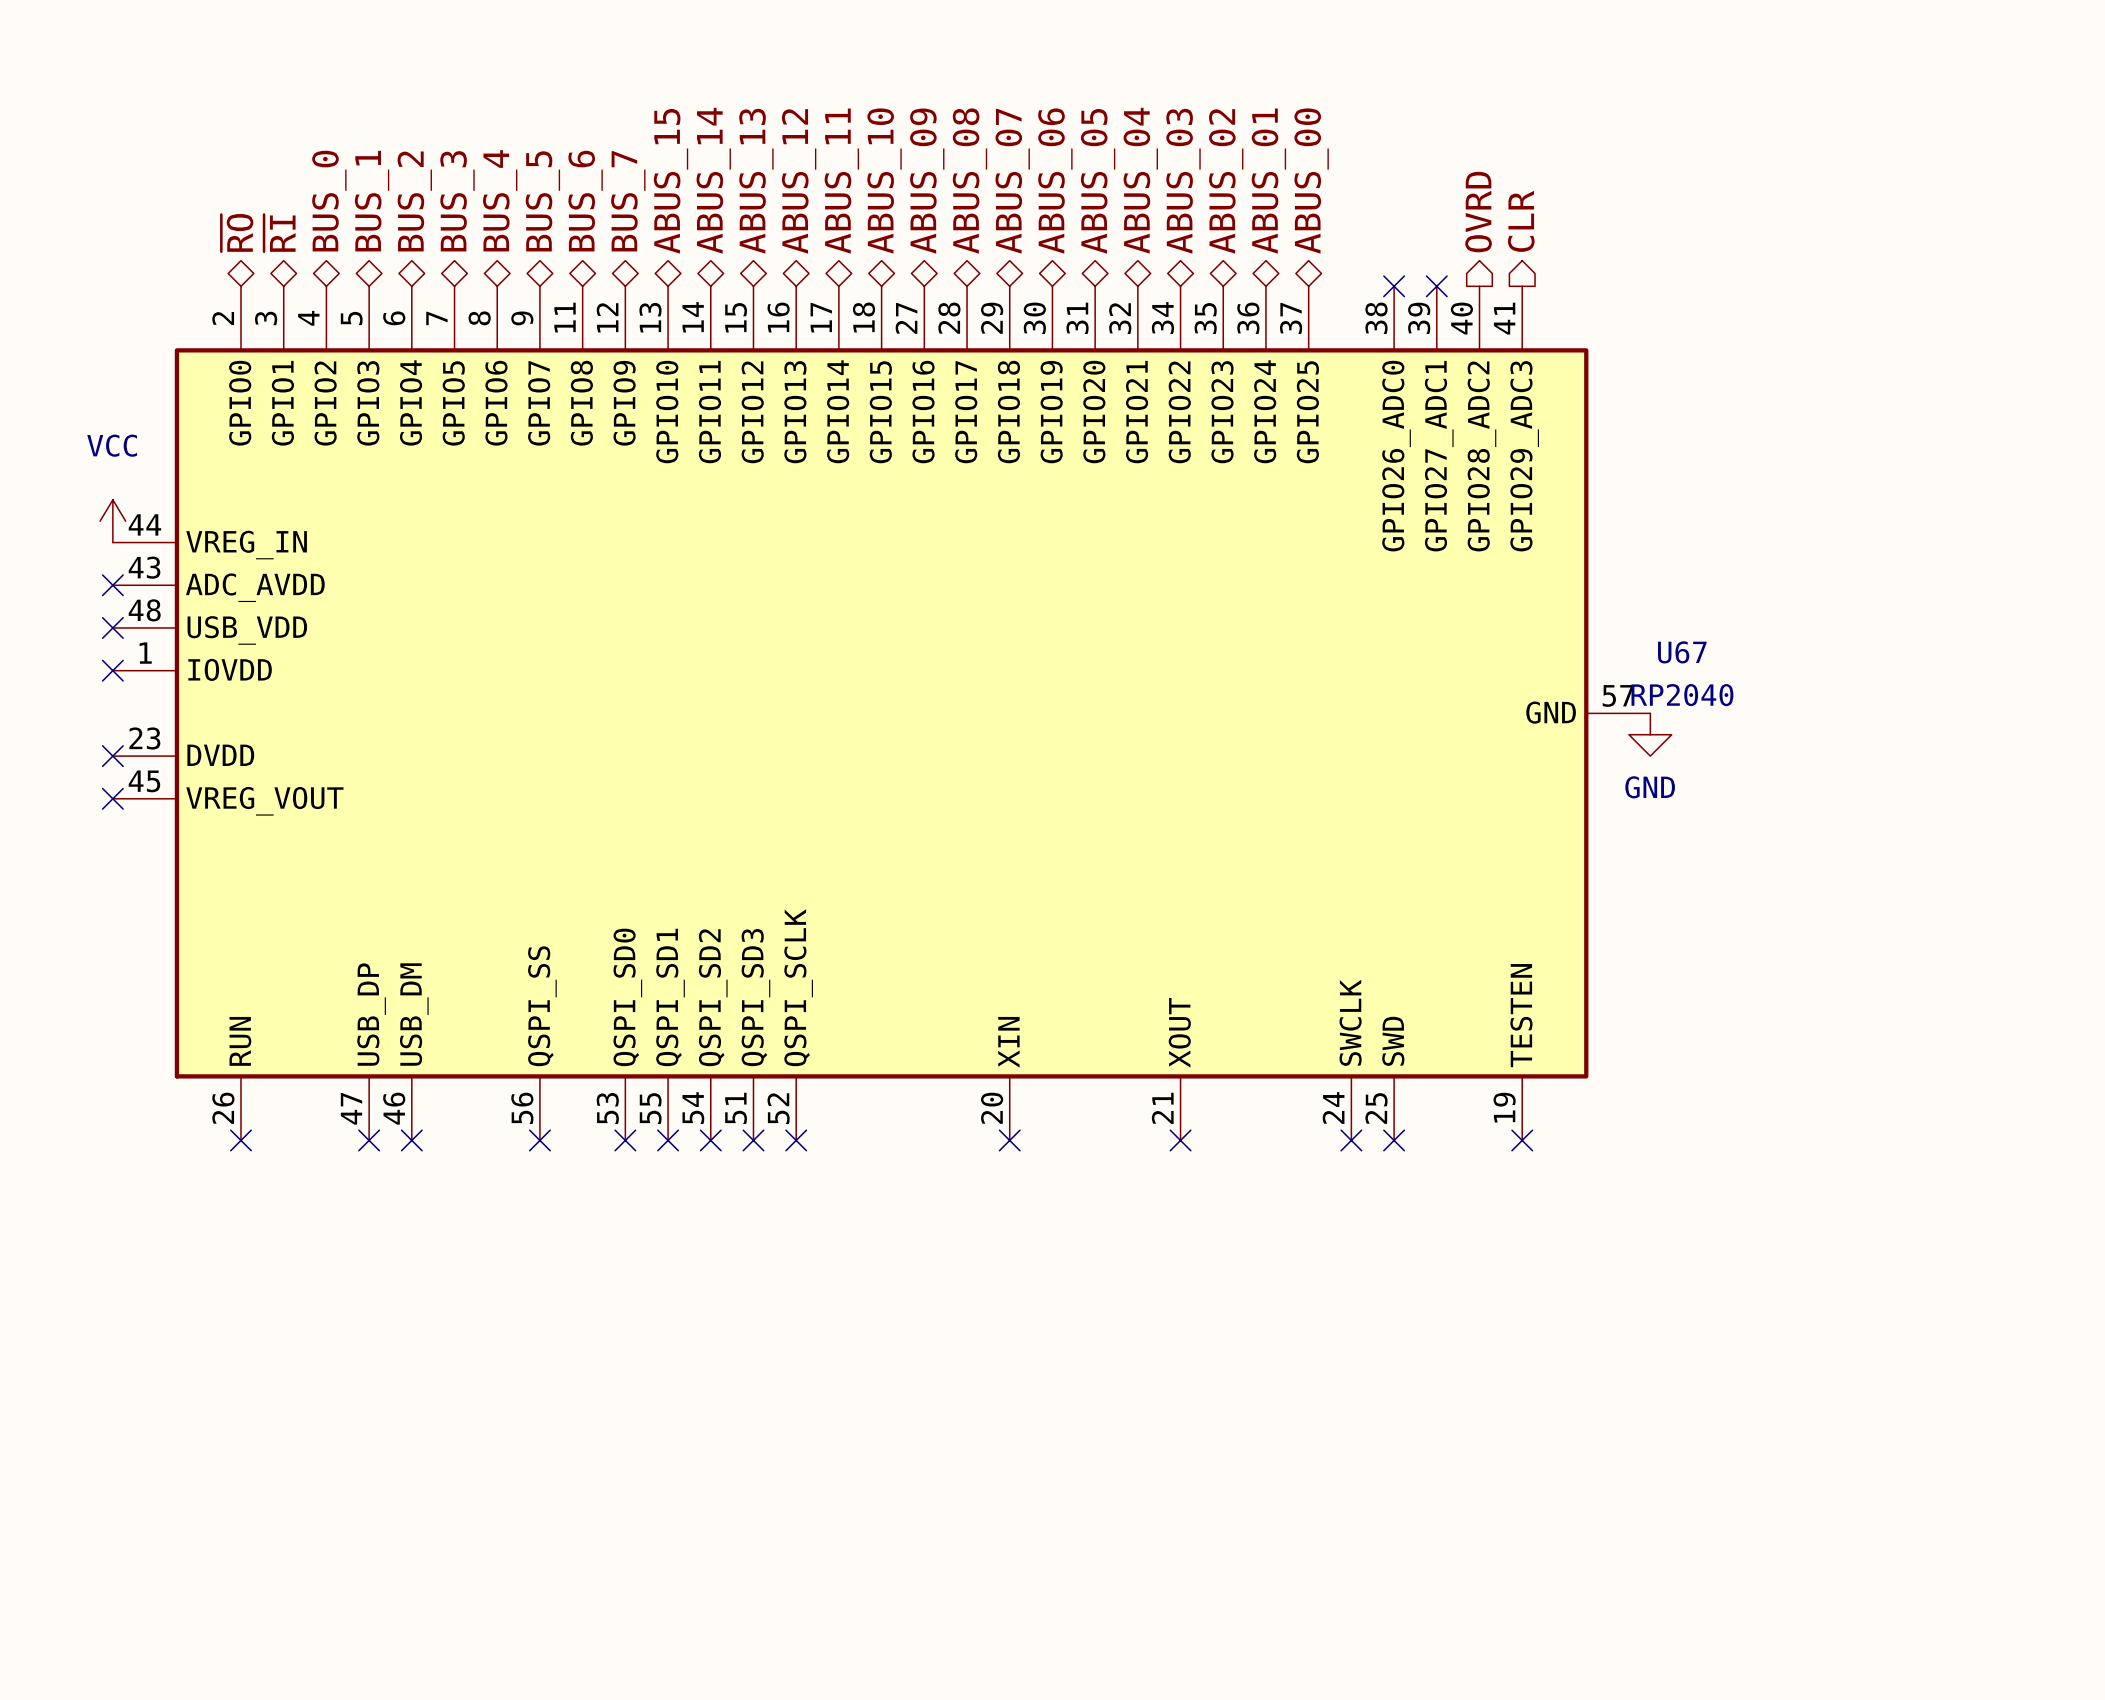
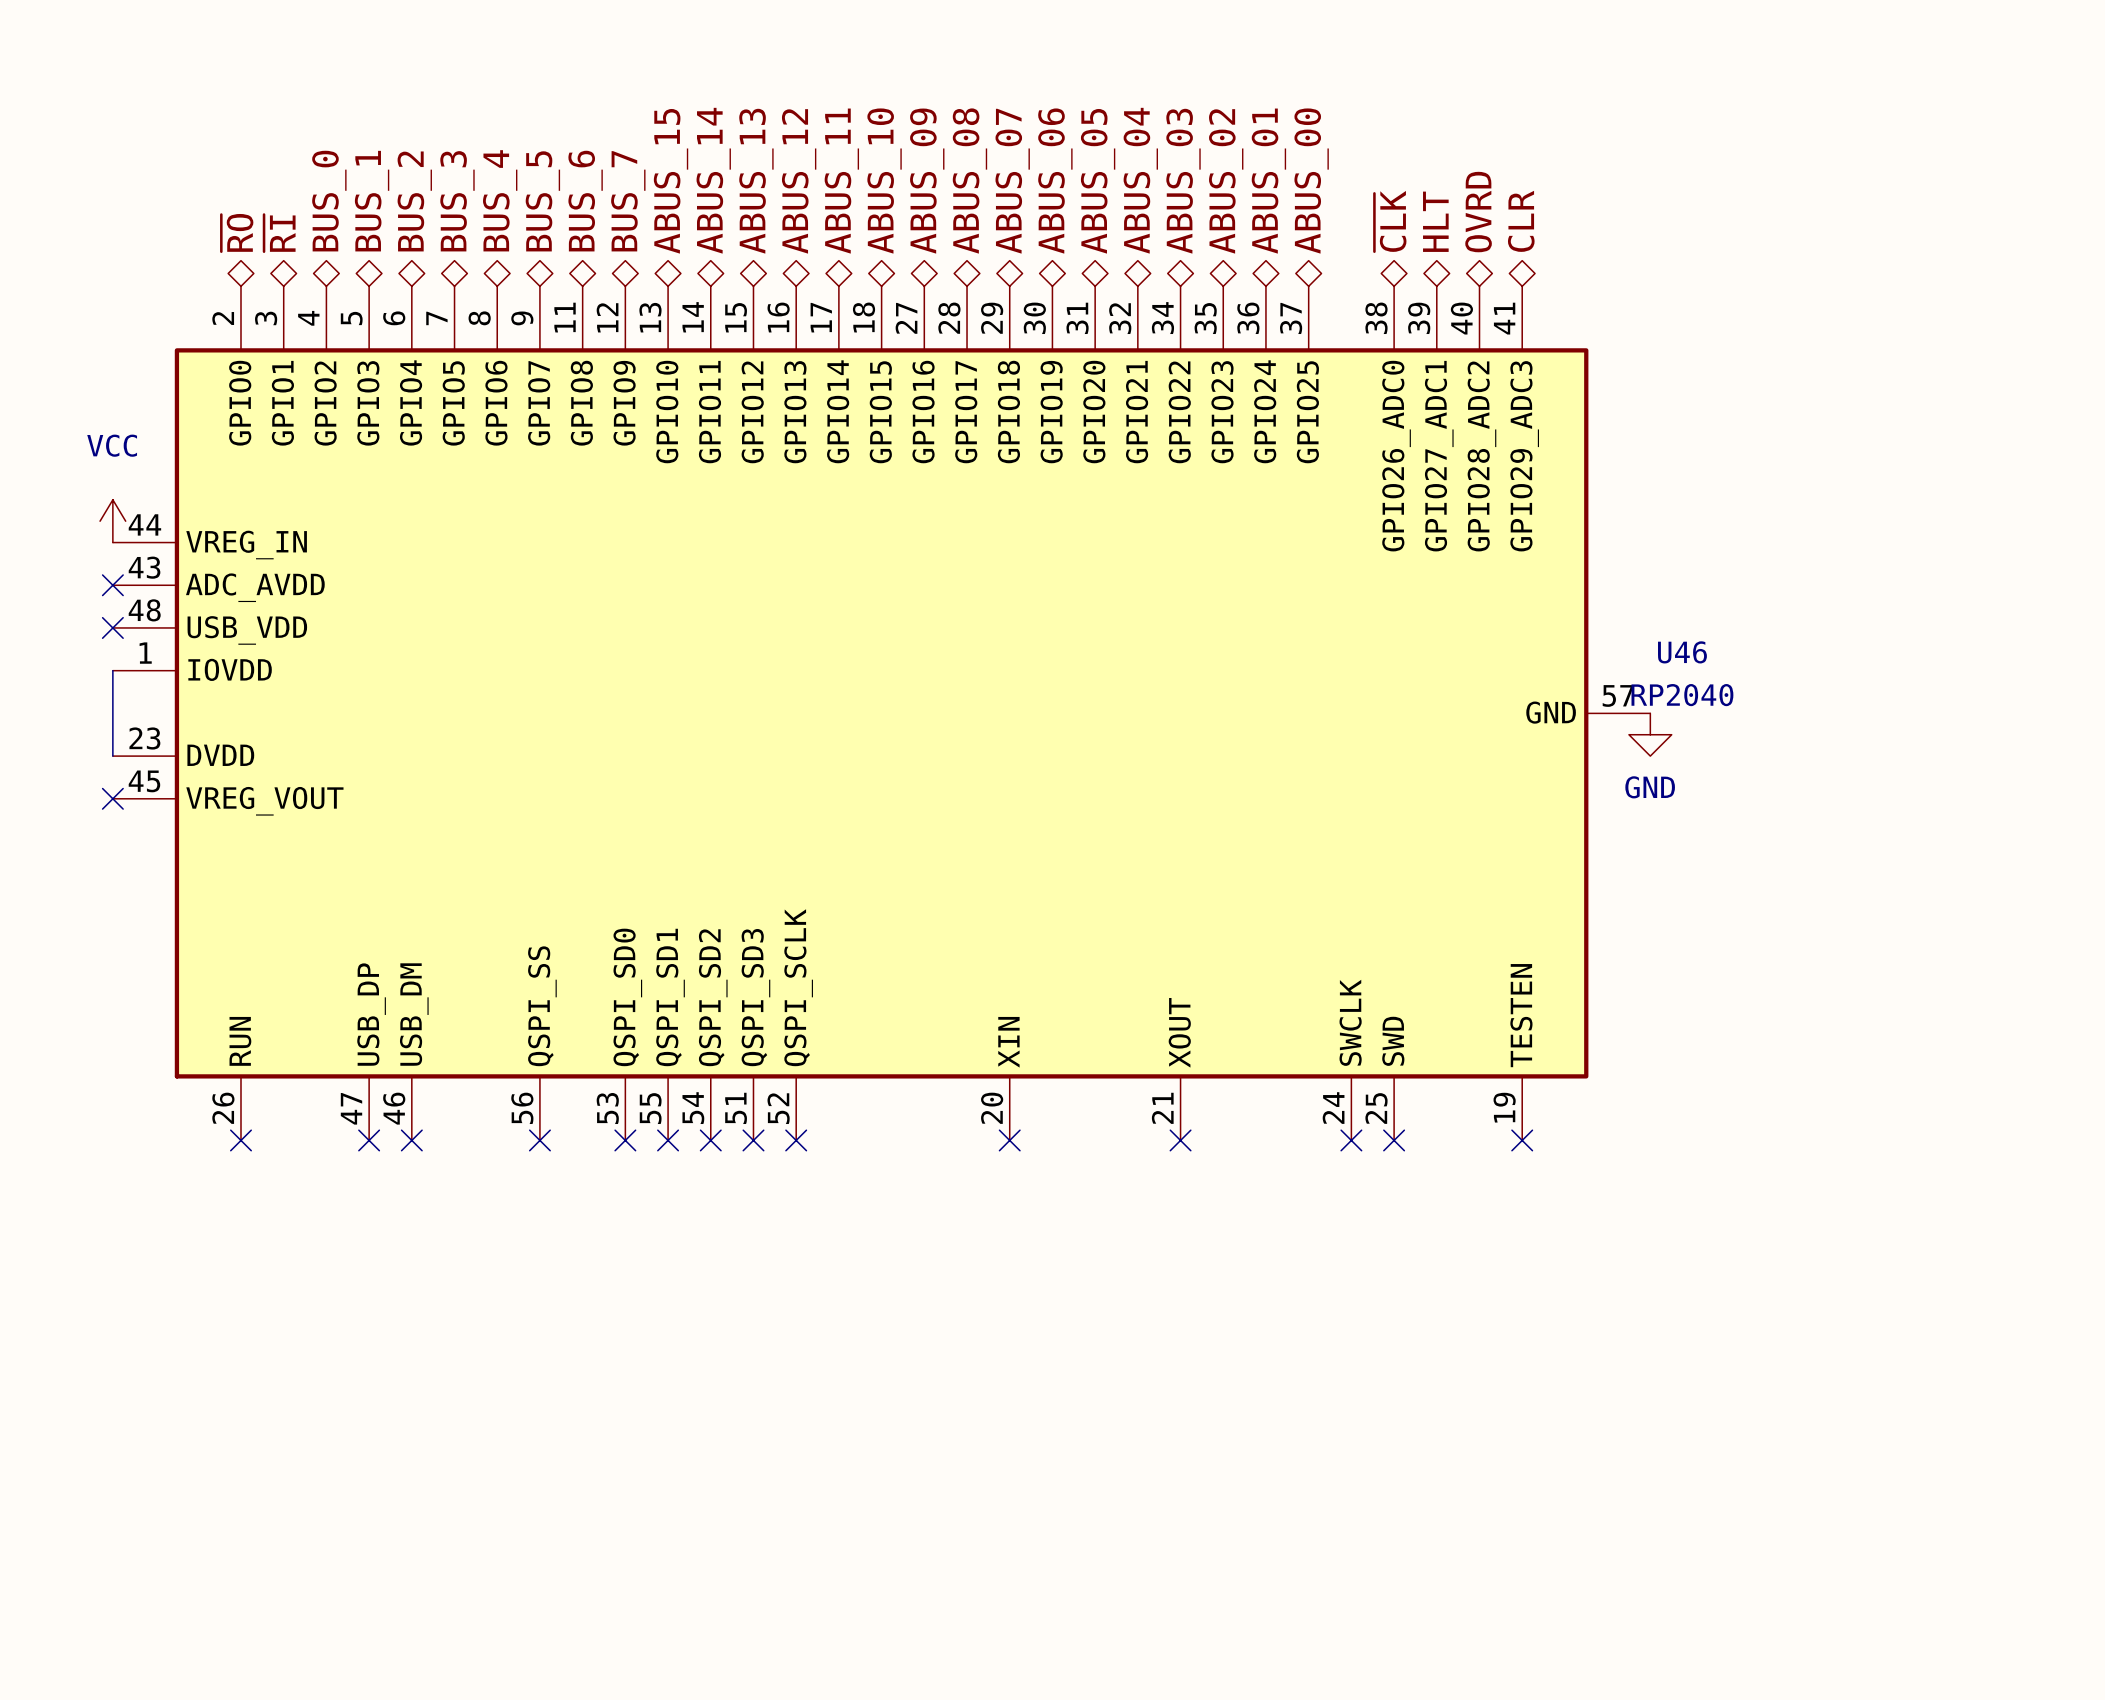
hierarchical label shape: output (1478, 212) -> bidirectional (1478, 212)
hierarchical label: none -> ~{CLK} (1390, 221)
hierarchical label: none -> HLT (1435, 221)
hierarchical label shape: output (1521, 221) -> bidirectional (1521, 221)
no-connect mark: (1394, 286) -> none
no-connect mark: (1436, 286) -> none
U67 name: U67 (1682, 652) -> U46 (1682, 652)
wire: none -> (112, 670) (112, 756)
no-connect mark: (112, 670) -> none
no-connect mark: (112, 756) -> none

